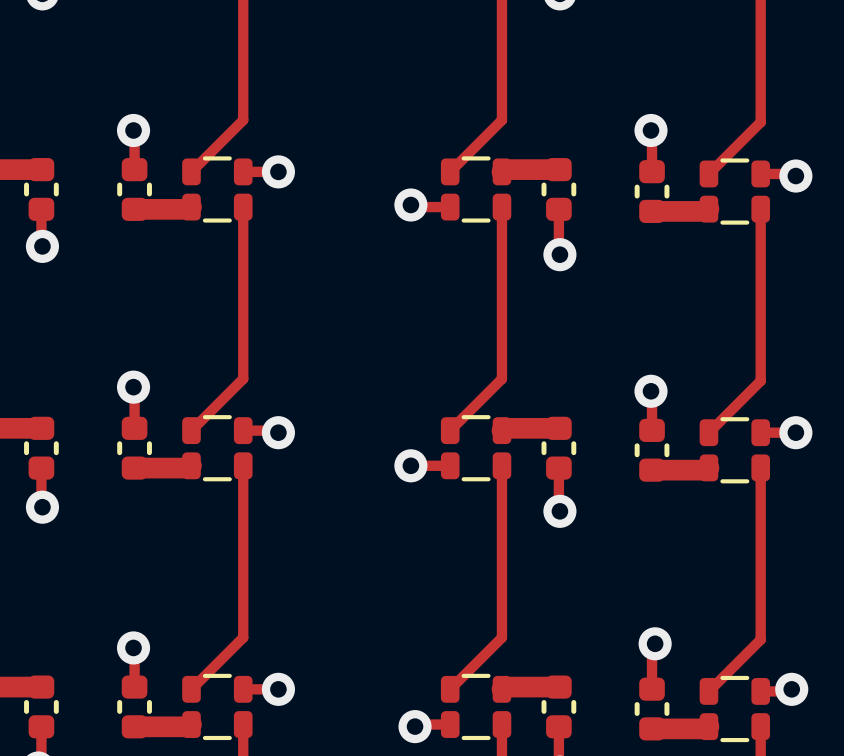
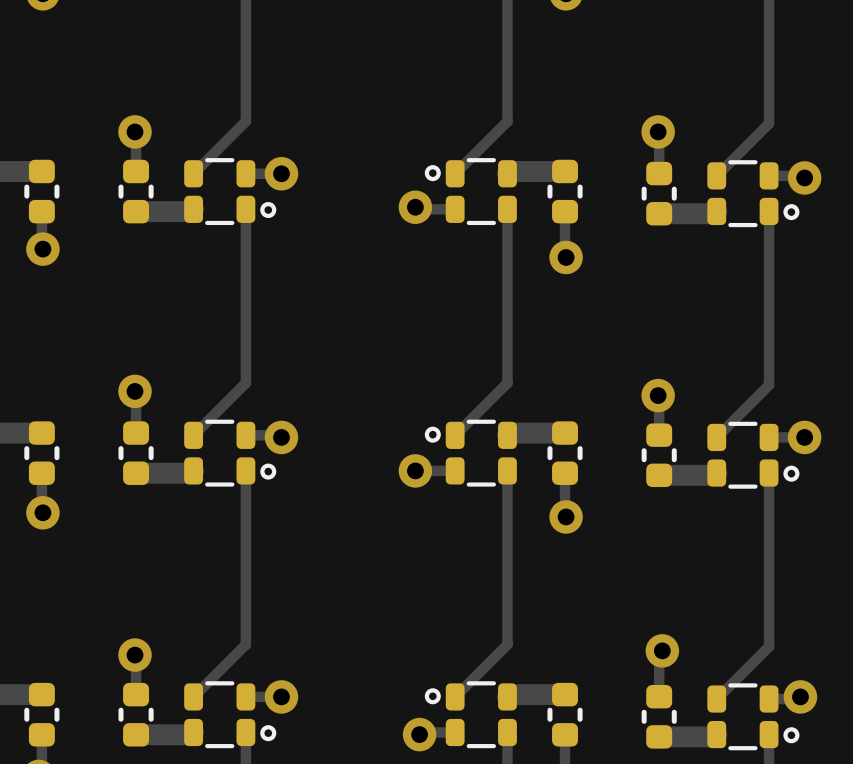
part footprint: [182, 156, 253, 223] -> [184, 158, 277, 226]
part footprint: [440, 156, 512, 223] -> [424, 158, 517, 226]
part footprint: [699, 158, 771, 225] -> [707, 160, 800, 228]
part footprint: [182, 415, 253, 482] -> [184, 419, 277, 487]
part footprint: [440, 415, 512, 482] -> [424, 419, 517, 487]
part footprint: [699, 417, 771, 484] -> [707, 421, 800, 489]
part footprint: [182, 673, 253, 741] -> [184, 681, 277, 749]
part footprint: [440, 673, 512, 741] -> [424, 681, 517, 749]
part footprint: [699, 675, 771, 743] -> [707, 683, 800, 751]

